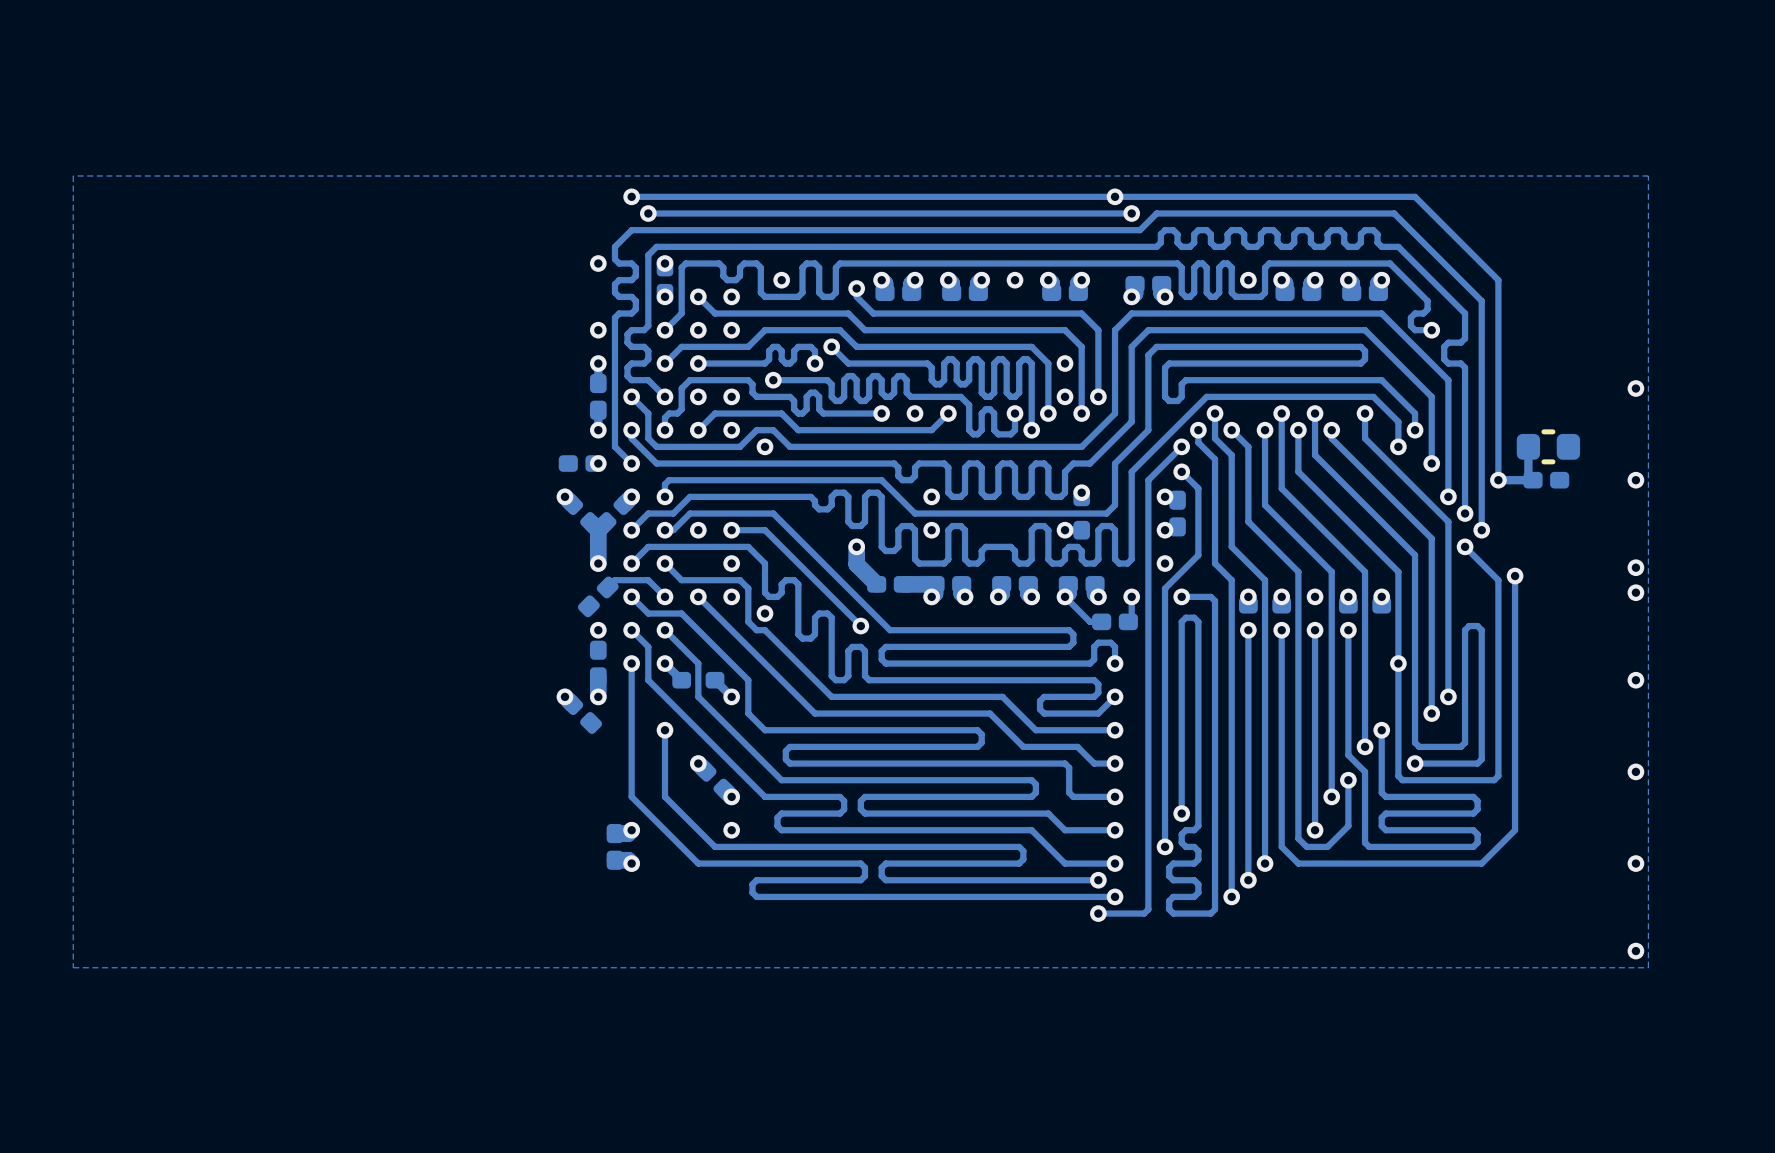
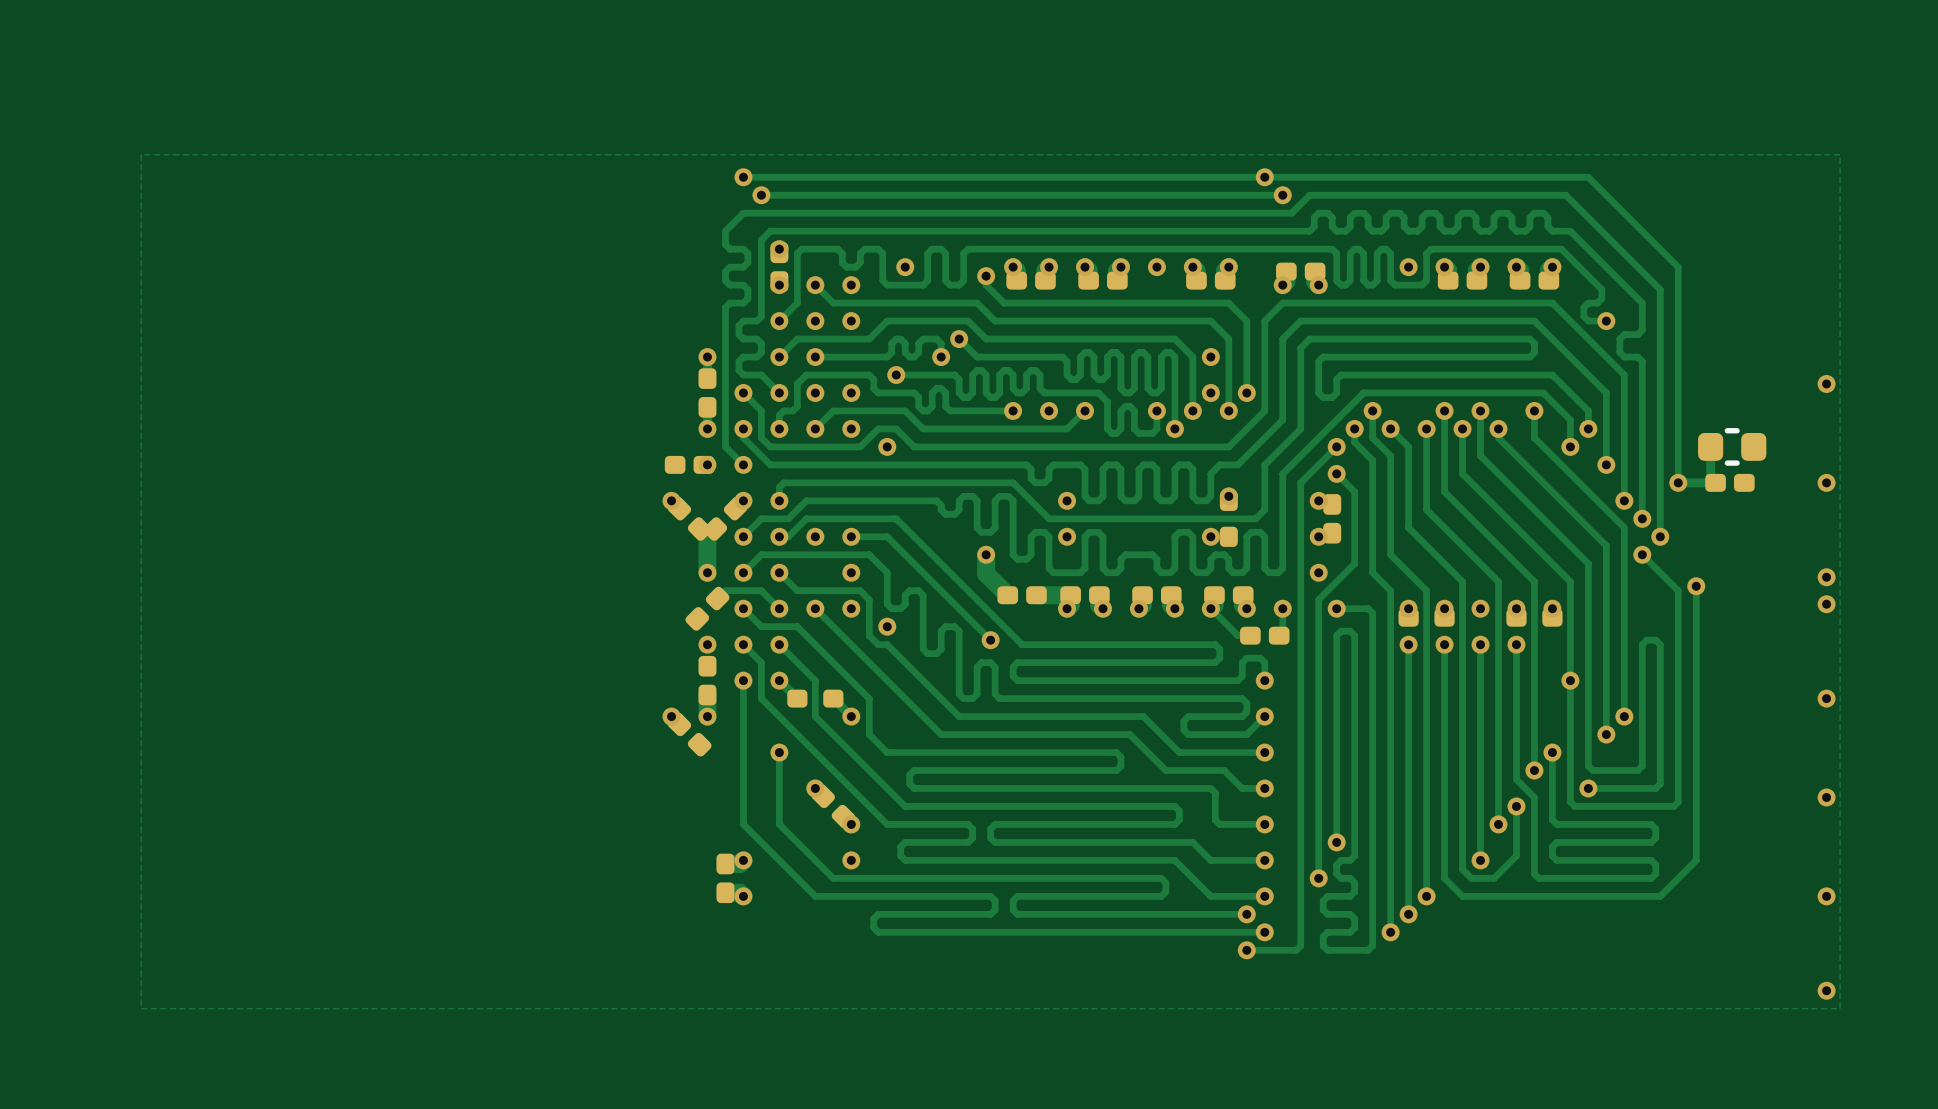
via: (598, 263) -> none
via: (598, 330) -> none

